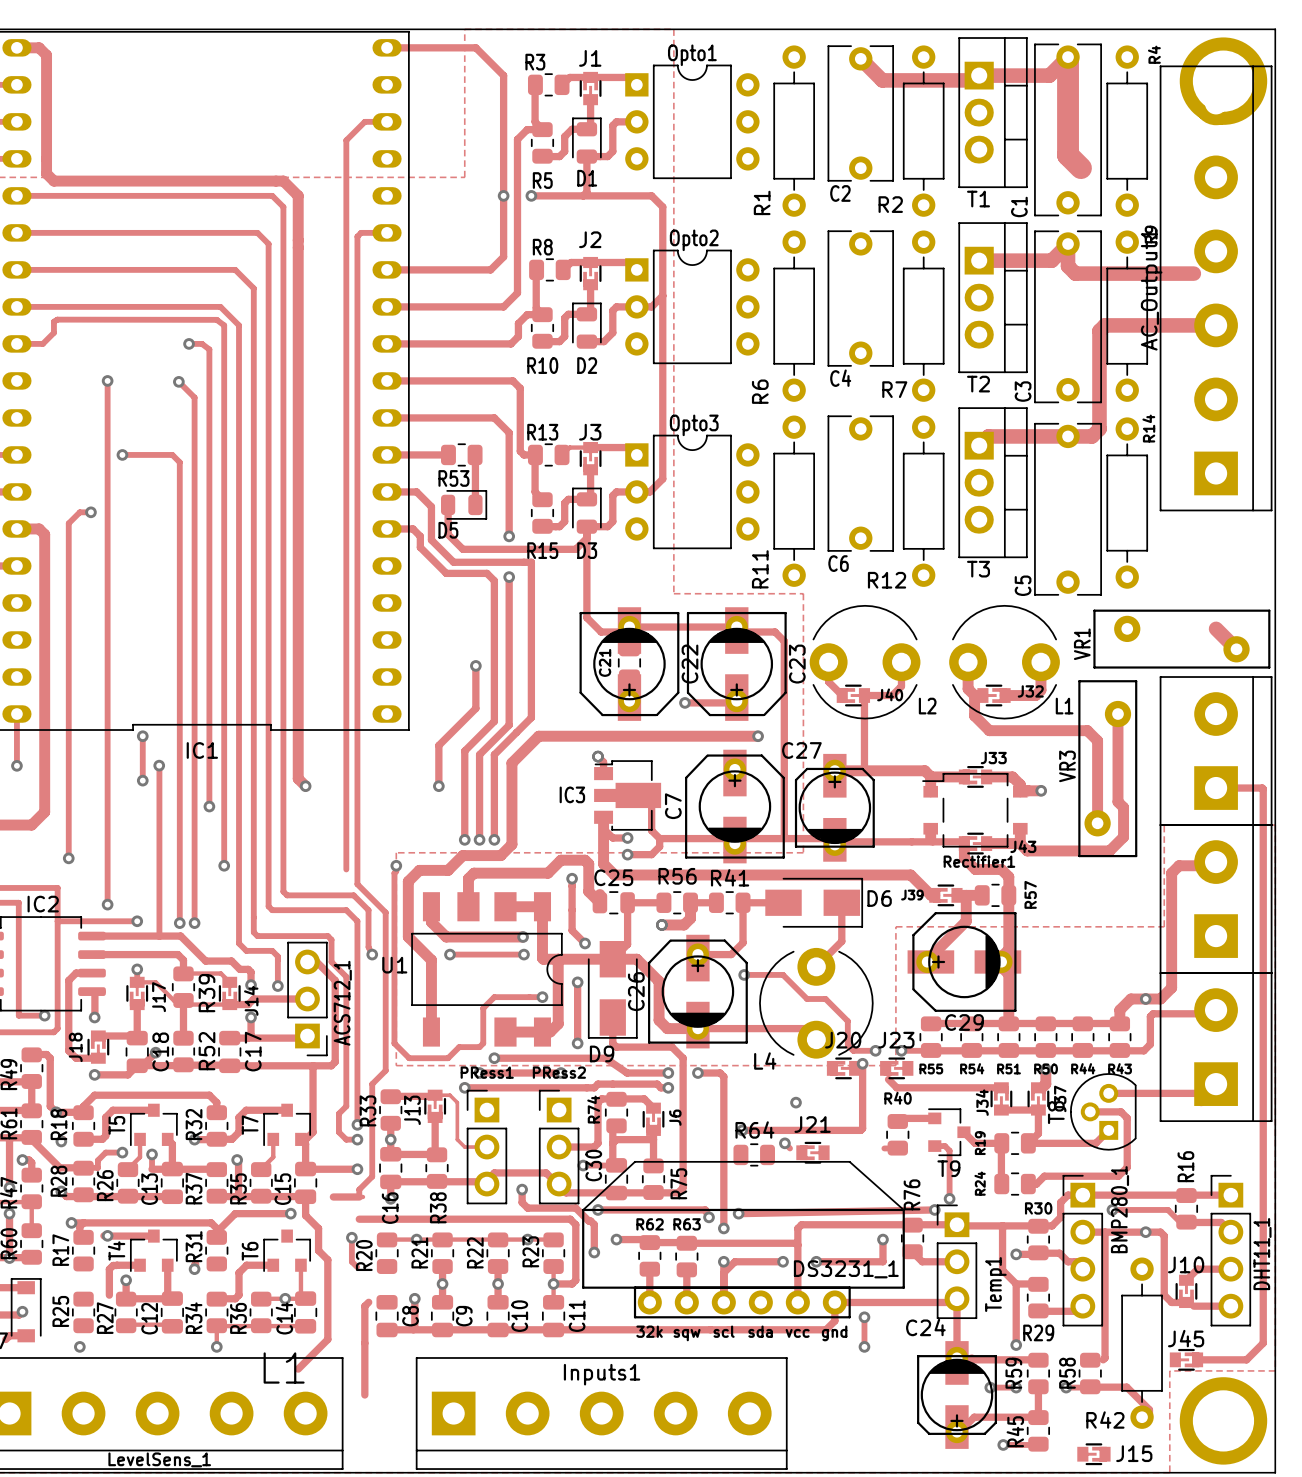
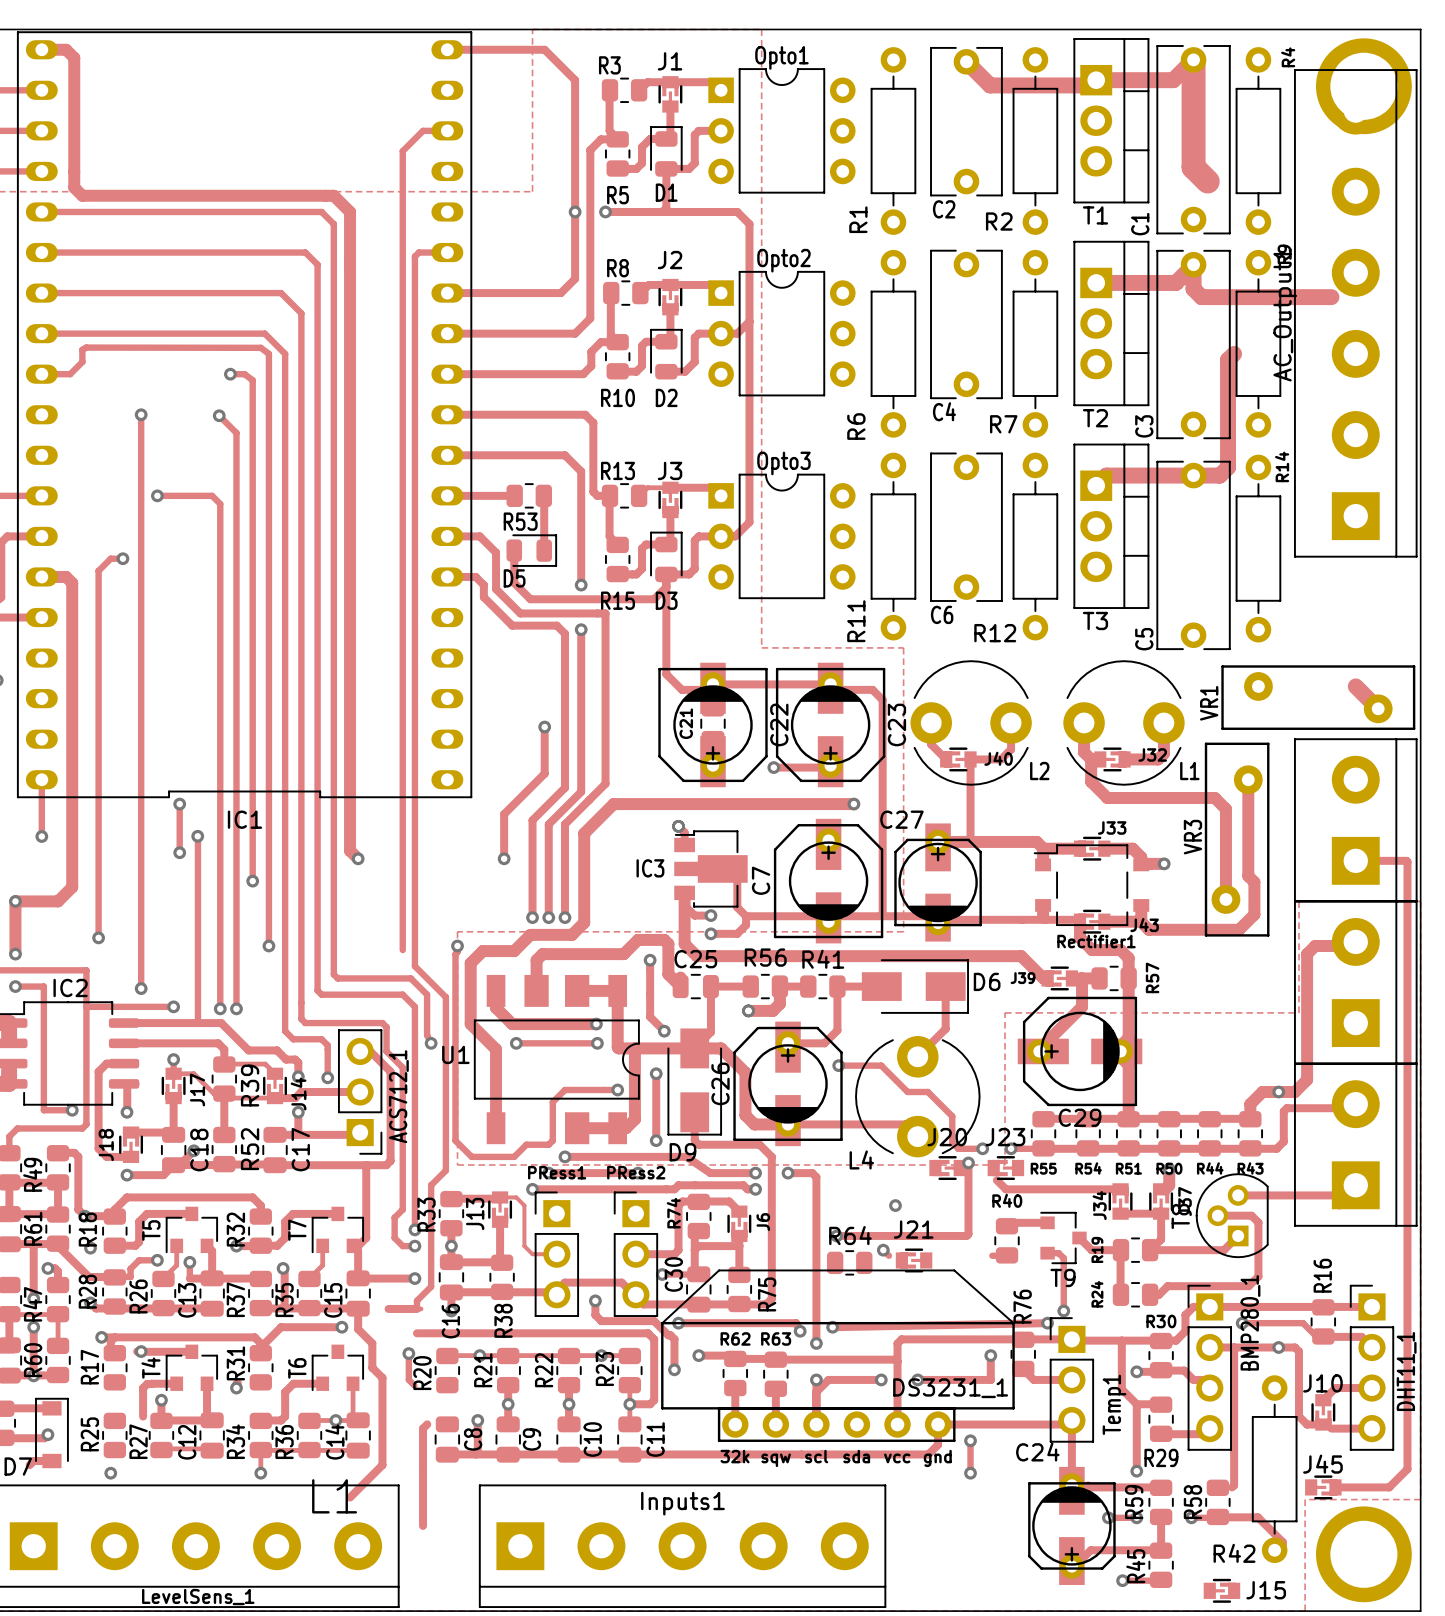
track: (1105, 325) (1216, 325) -> none

